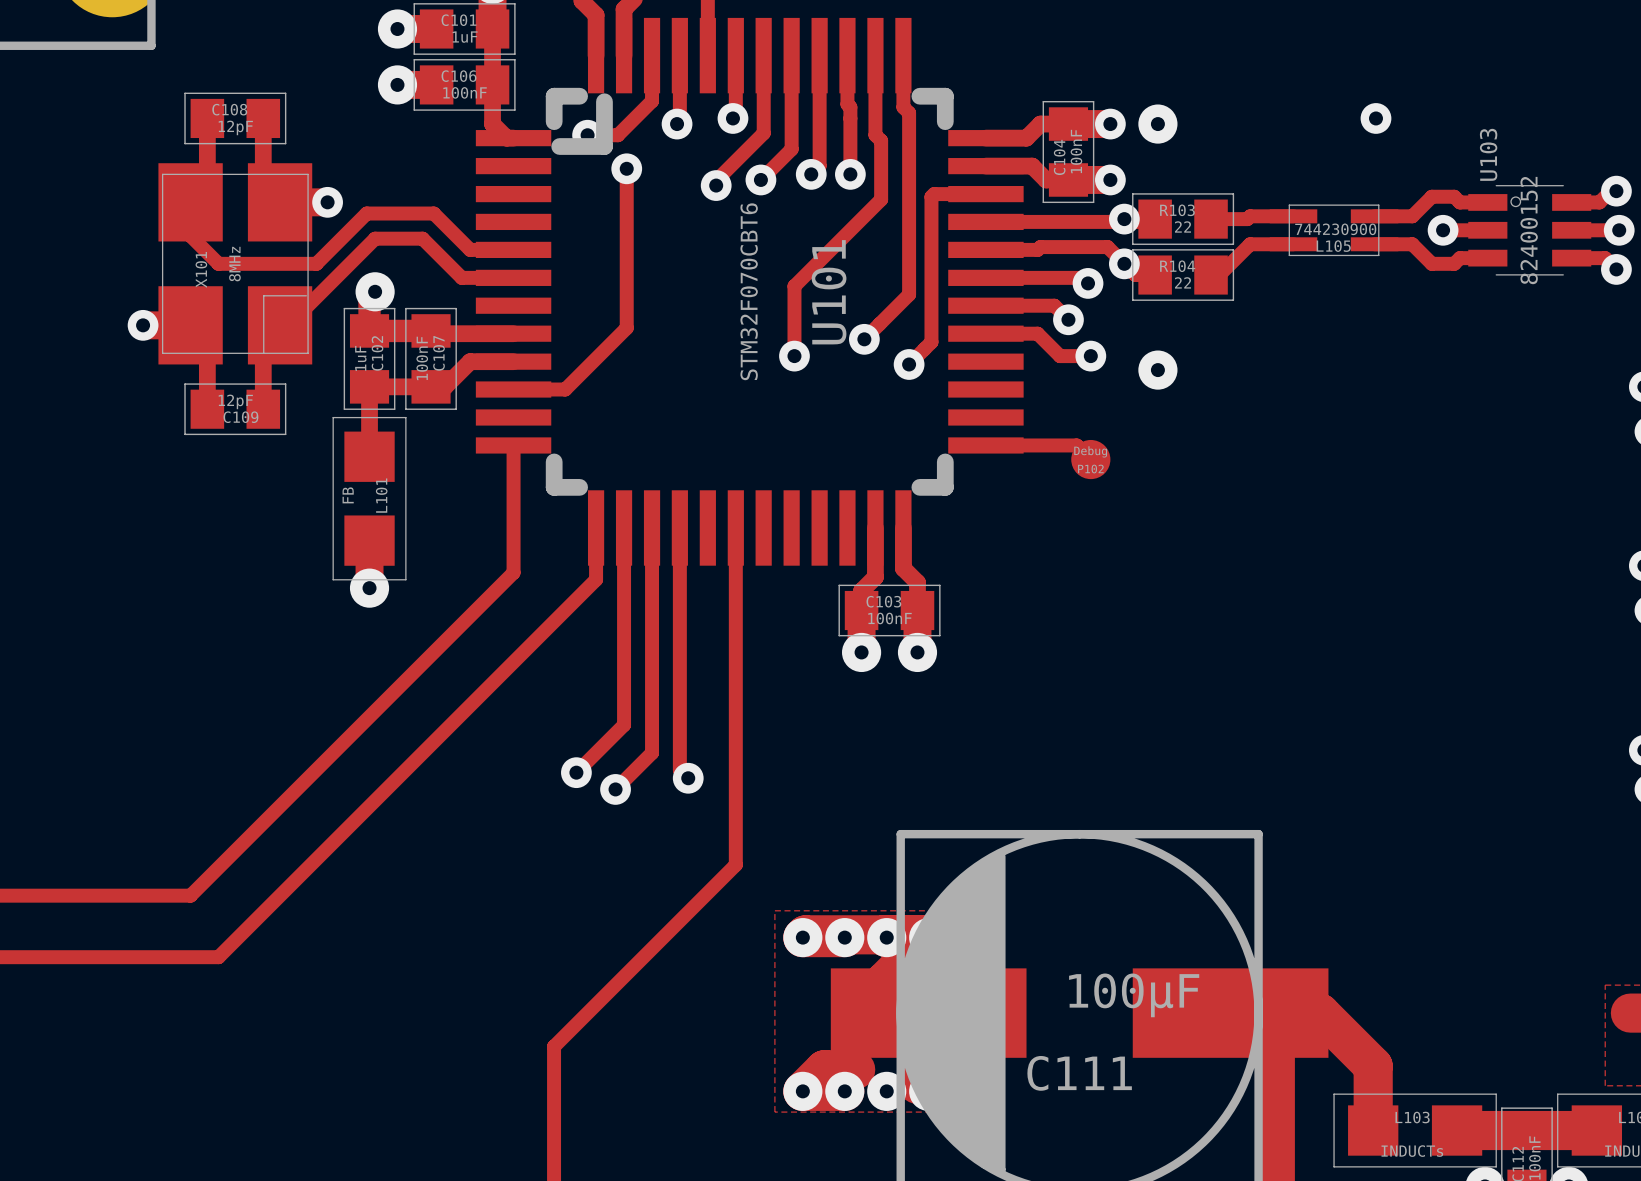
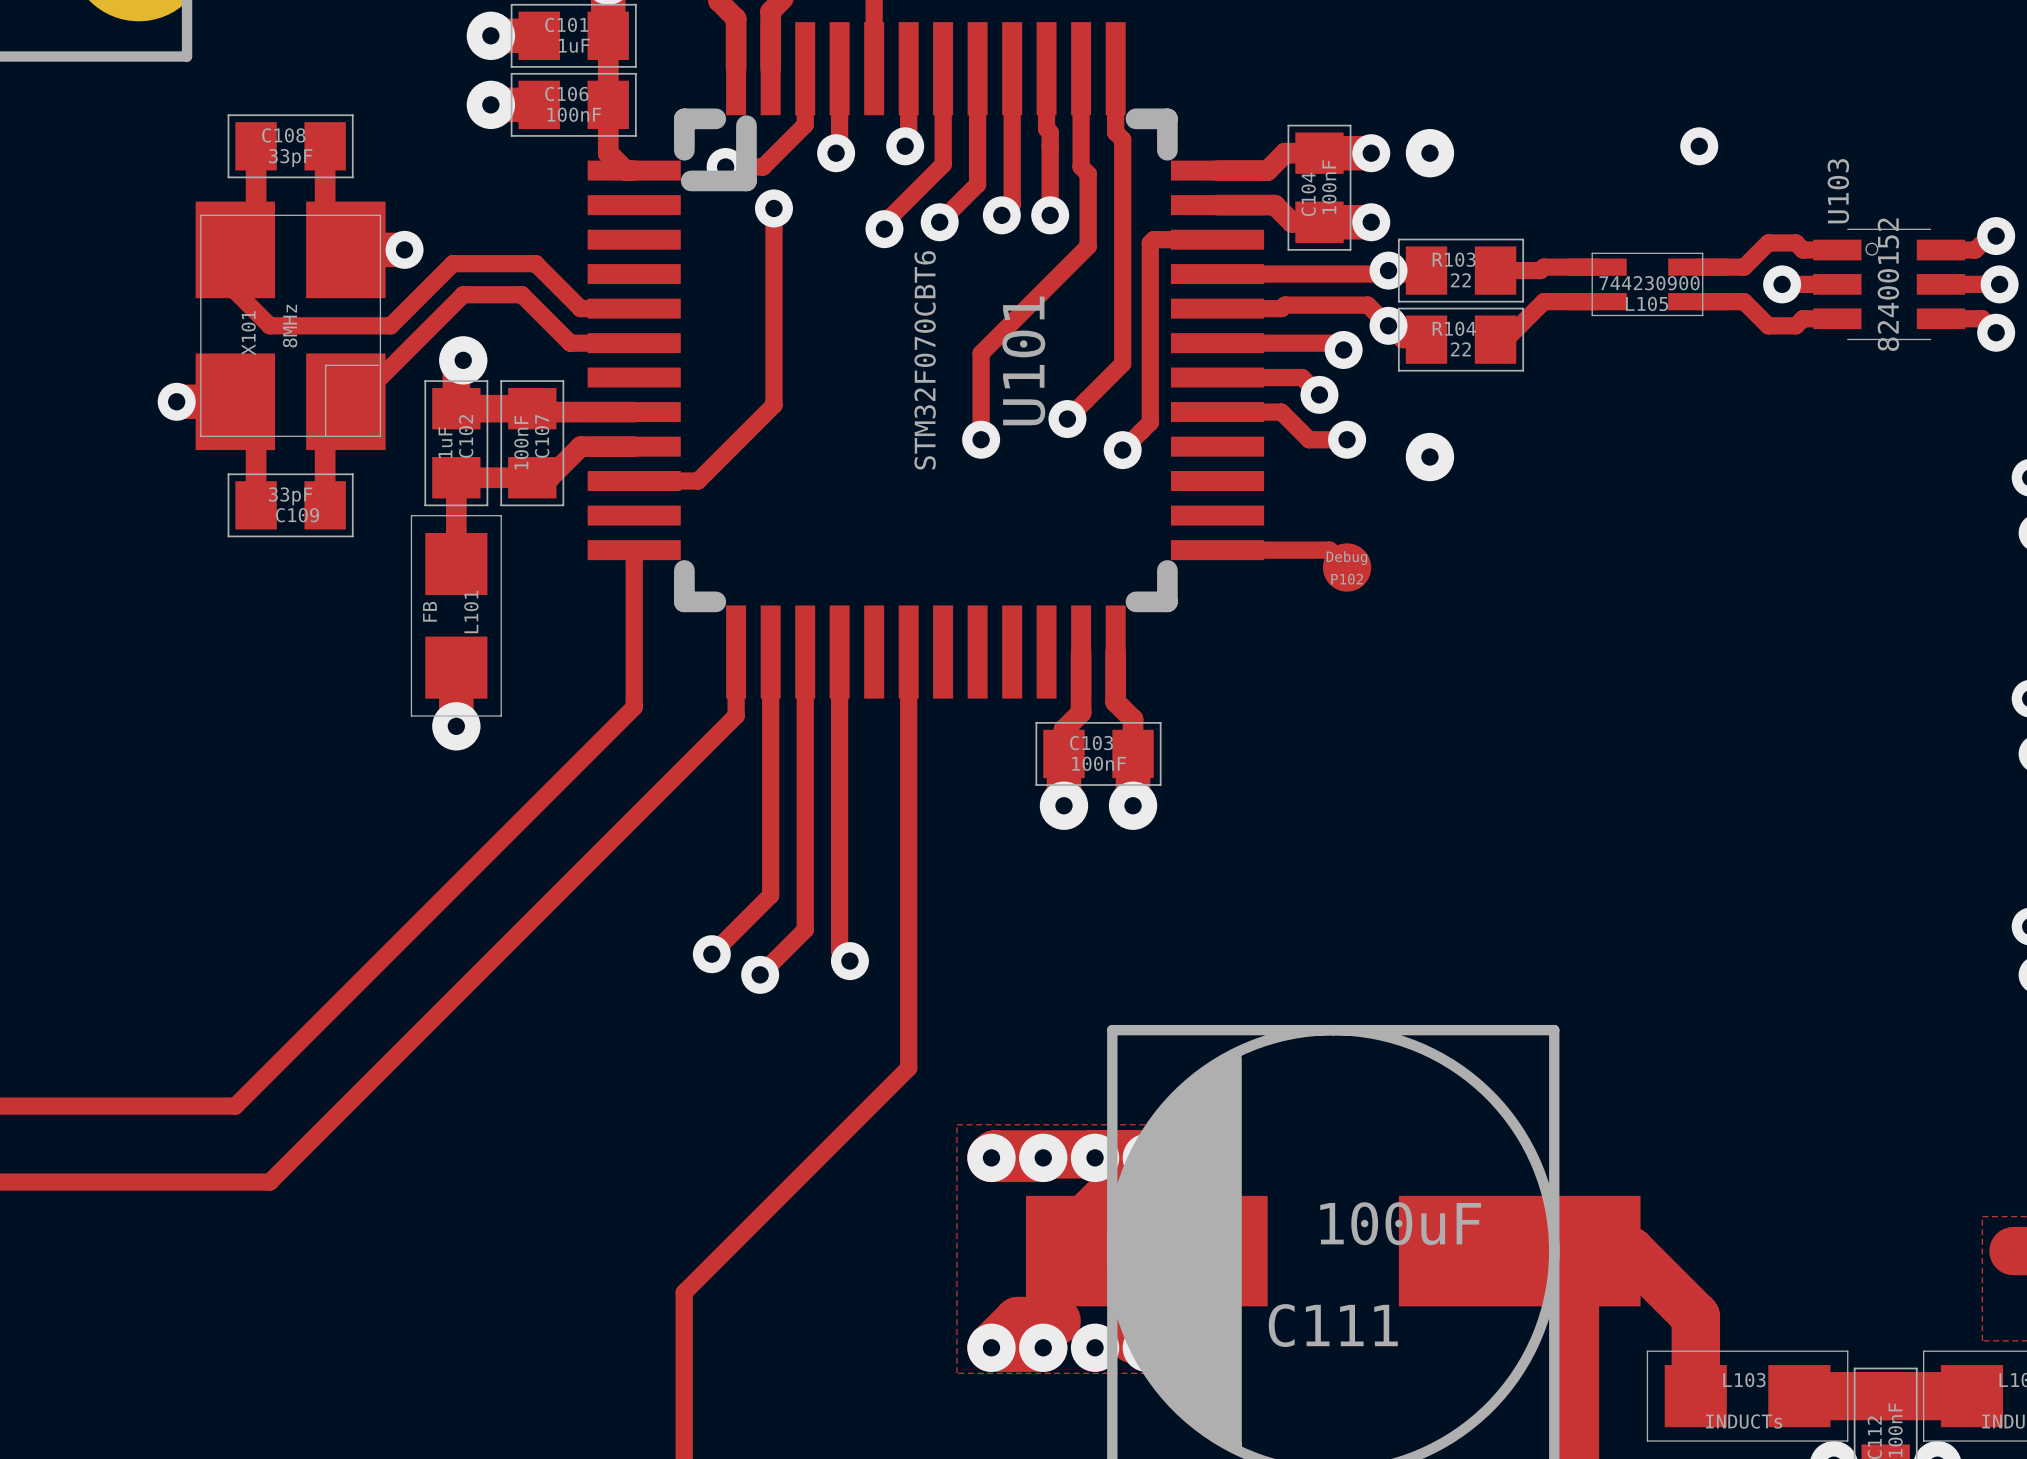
C108 value: 12pF (235, 127) -> 33pF (290, 157)
C109 value: 12pF (235, 401) -> 33pF (290, 496)
C111 value: 100µF (1134, 995) -> 100uF (1400, 1223)

